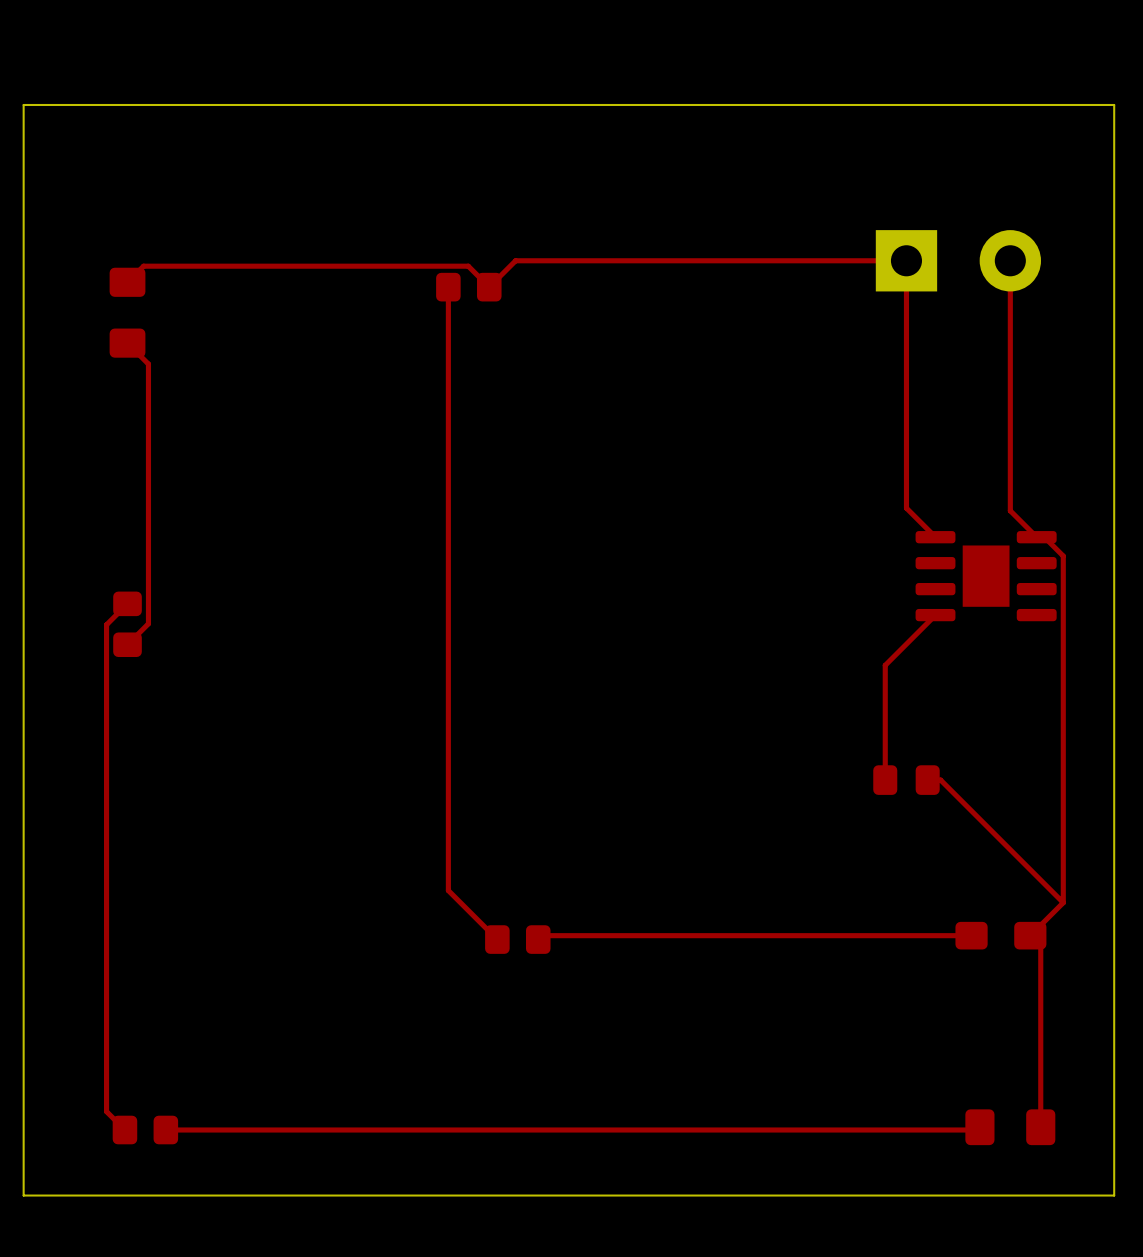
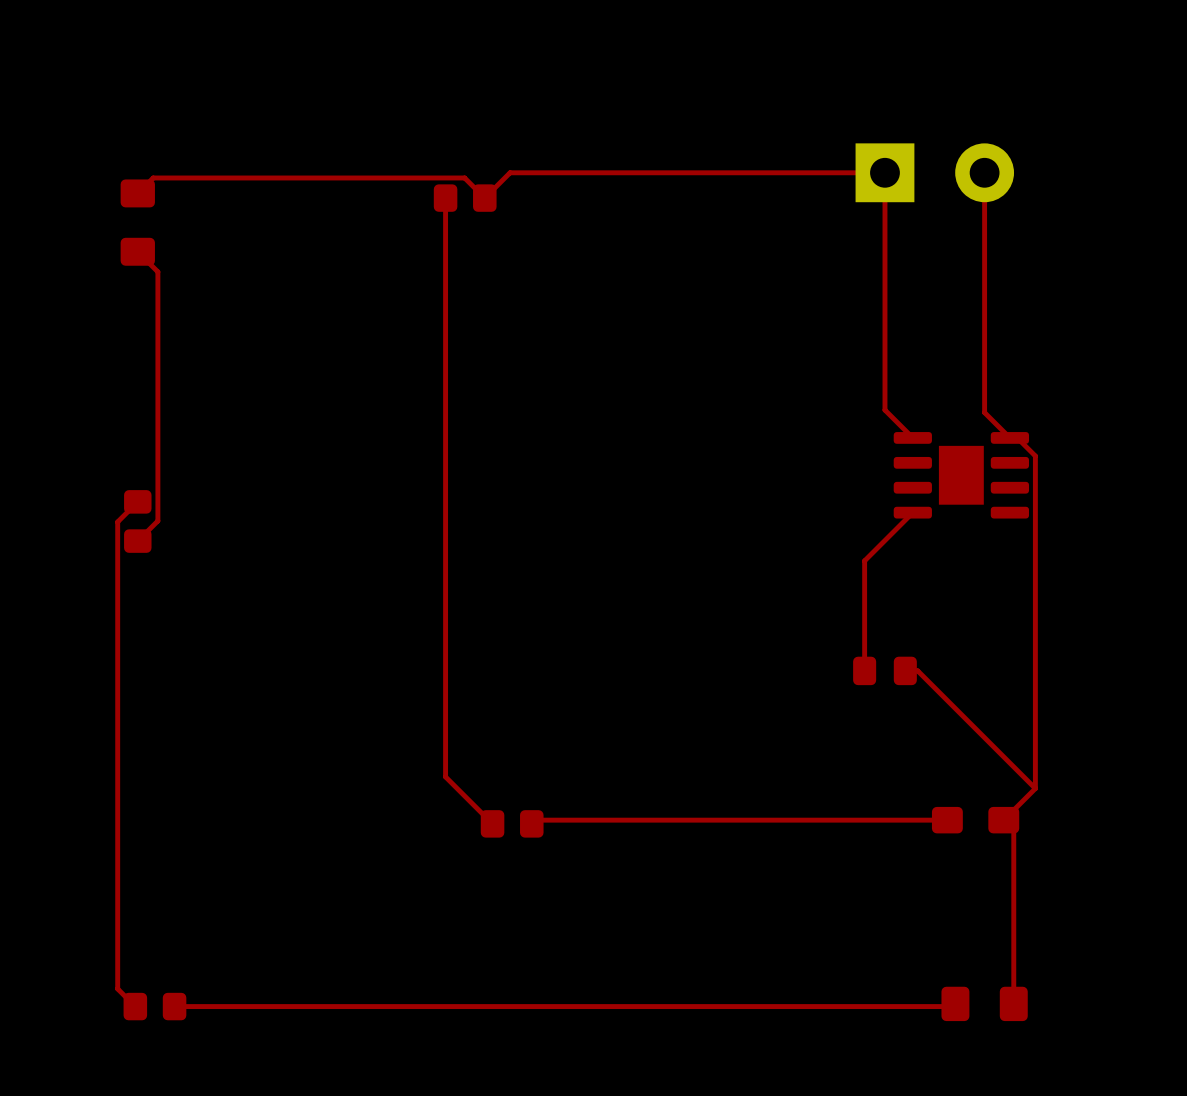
board edge: (1114, 104) (23, 104) (23, 1195) (1114, 1195) (1114, 104) -> none

